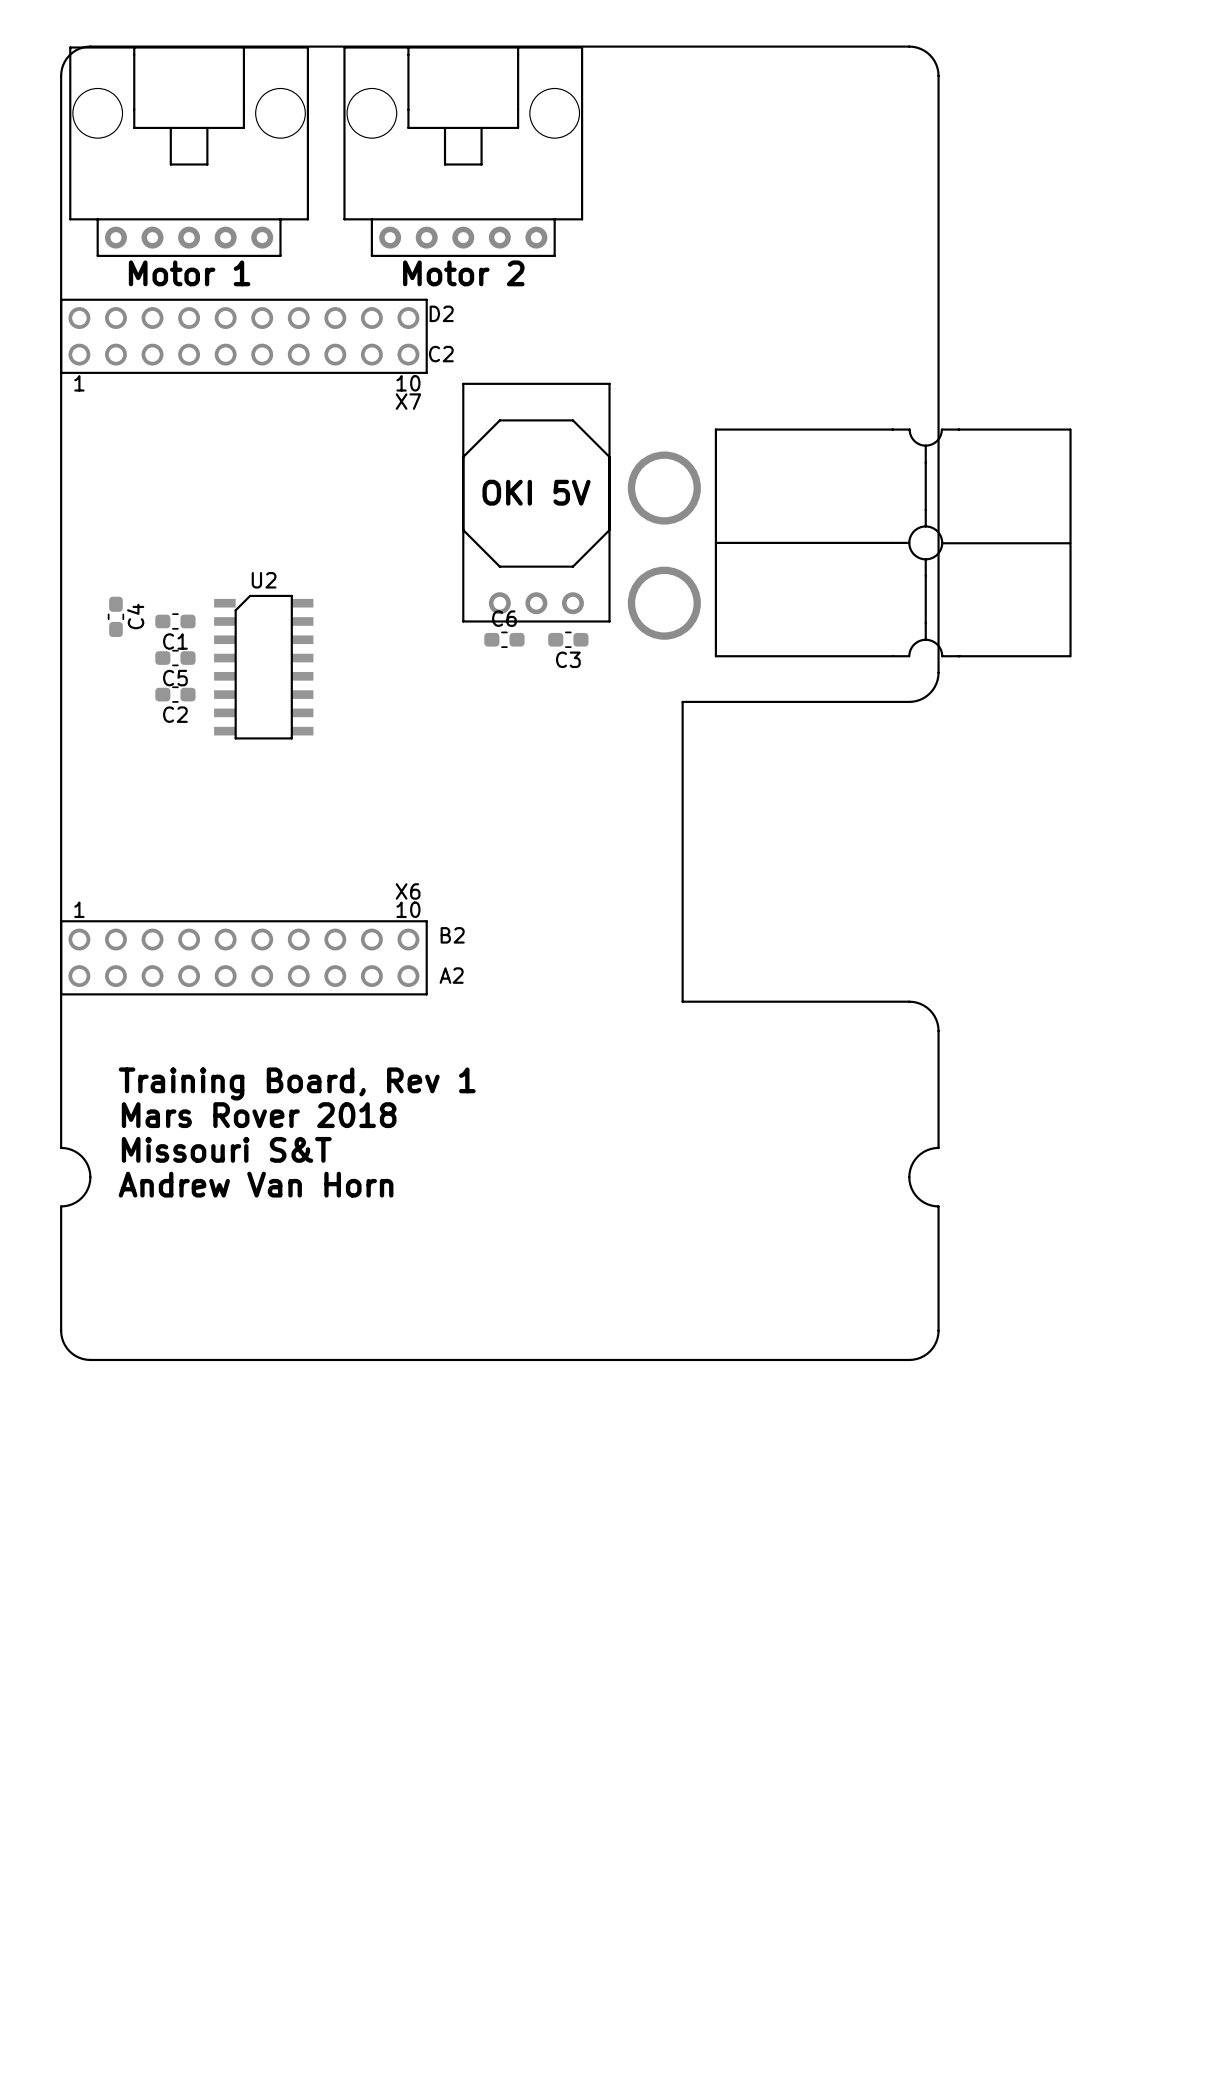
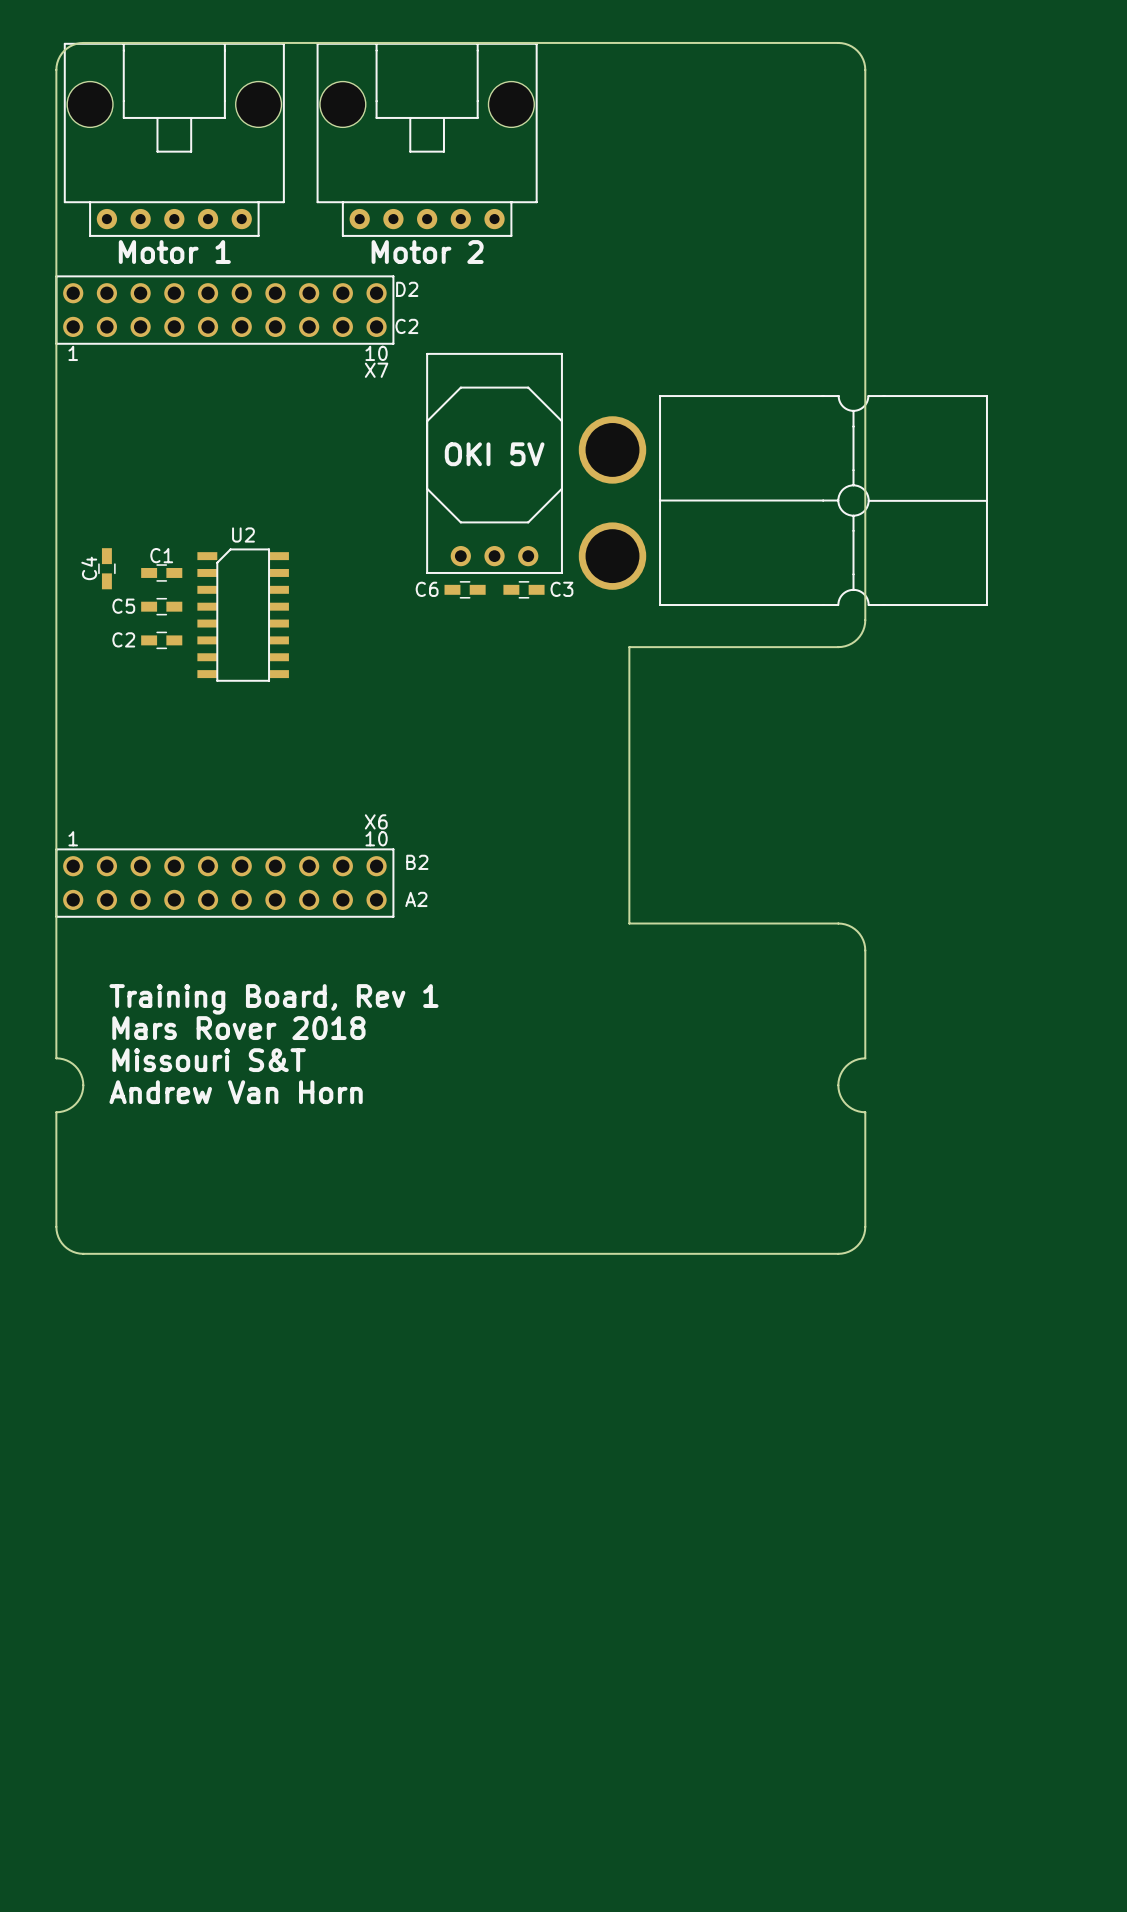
C4 footprint: [107, 596, 125, 638] -> [98, 548, 116, 590]
C1 footprint: [155, 613, 196, 630] -> [141, 564, 183, 582]
C4 name position: C4 (135, 616) -> C4 (89, 568)
C6 name position: C6 (504, 618) -> C6 (427, 589)
C6 footprint: [484, 631, 525, 648] -> [444, 581, 486, 599]
C3 footprint: [548, 631, 589, 648] -> [503, 581, 545, 599]
C1 name position: C1 (175, 641) -> C1 (161, 555)
C5 footprint: [155, 649, 196, 667] -> [141, 597, 183, 616]
C3 name position: C3 (568, 659) -> C3 (561, 589)
C5 name position: C5 (175, 678) -> C5 (123, 606)
C2 footprint: [155, 686, 196, 703] -> [141, 631, 183, 650]
C2 name position: C2 (175, 714) -> C2 (123, 639)

